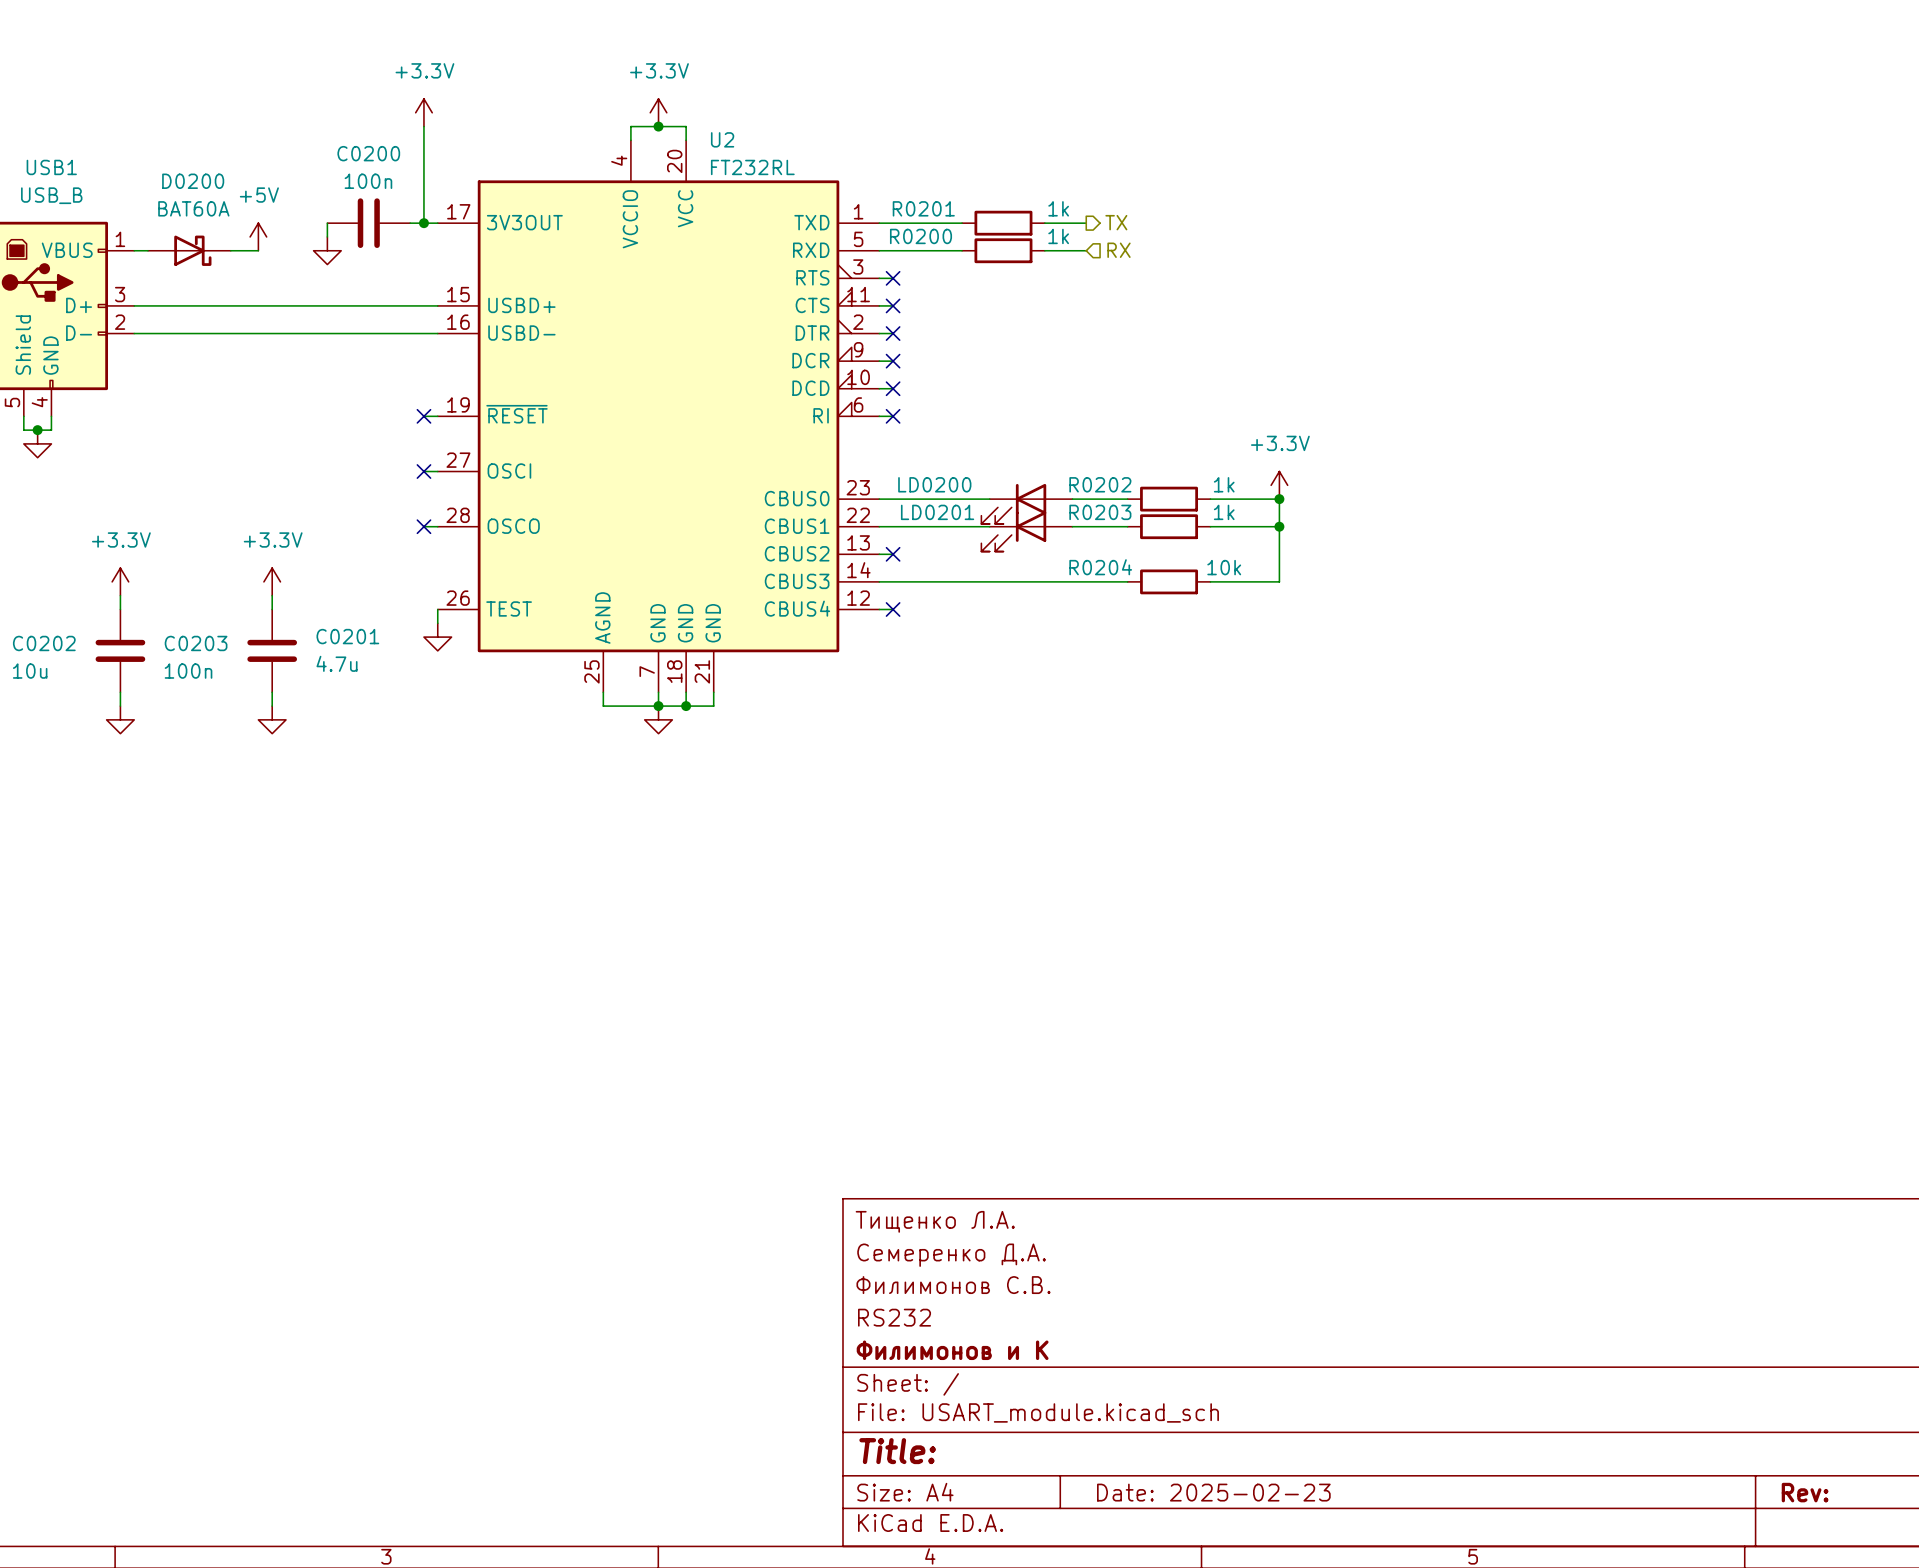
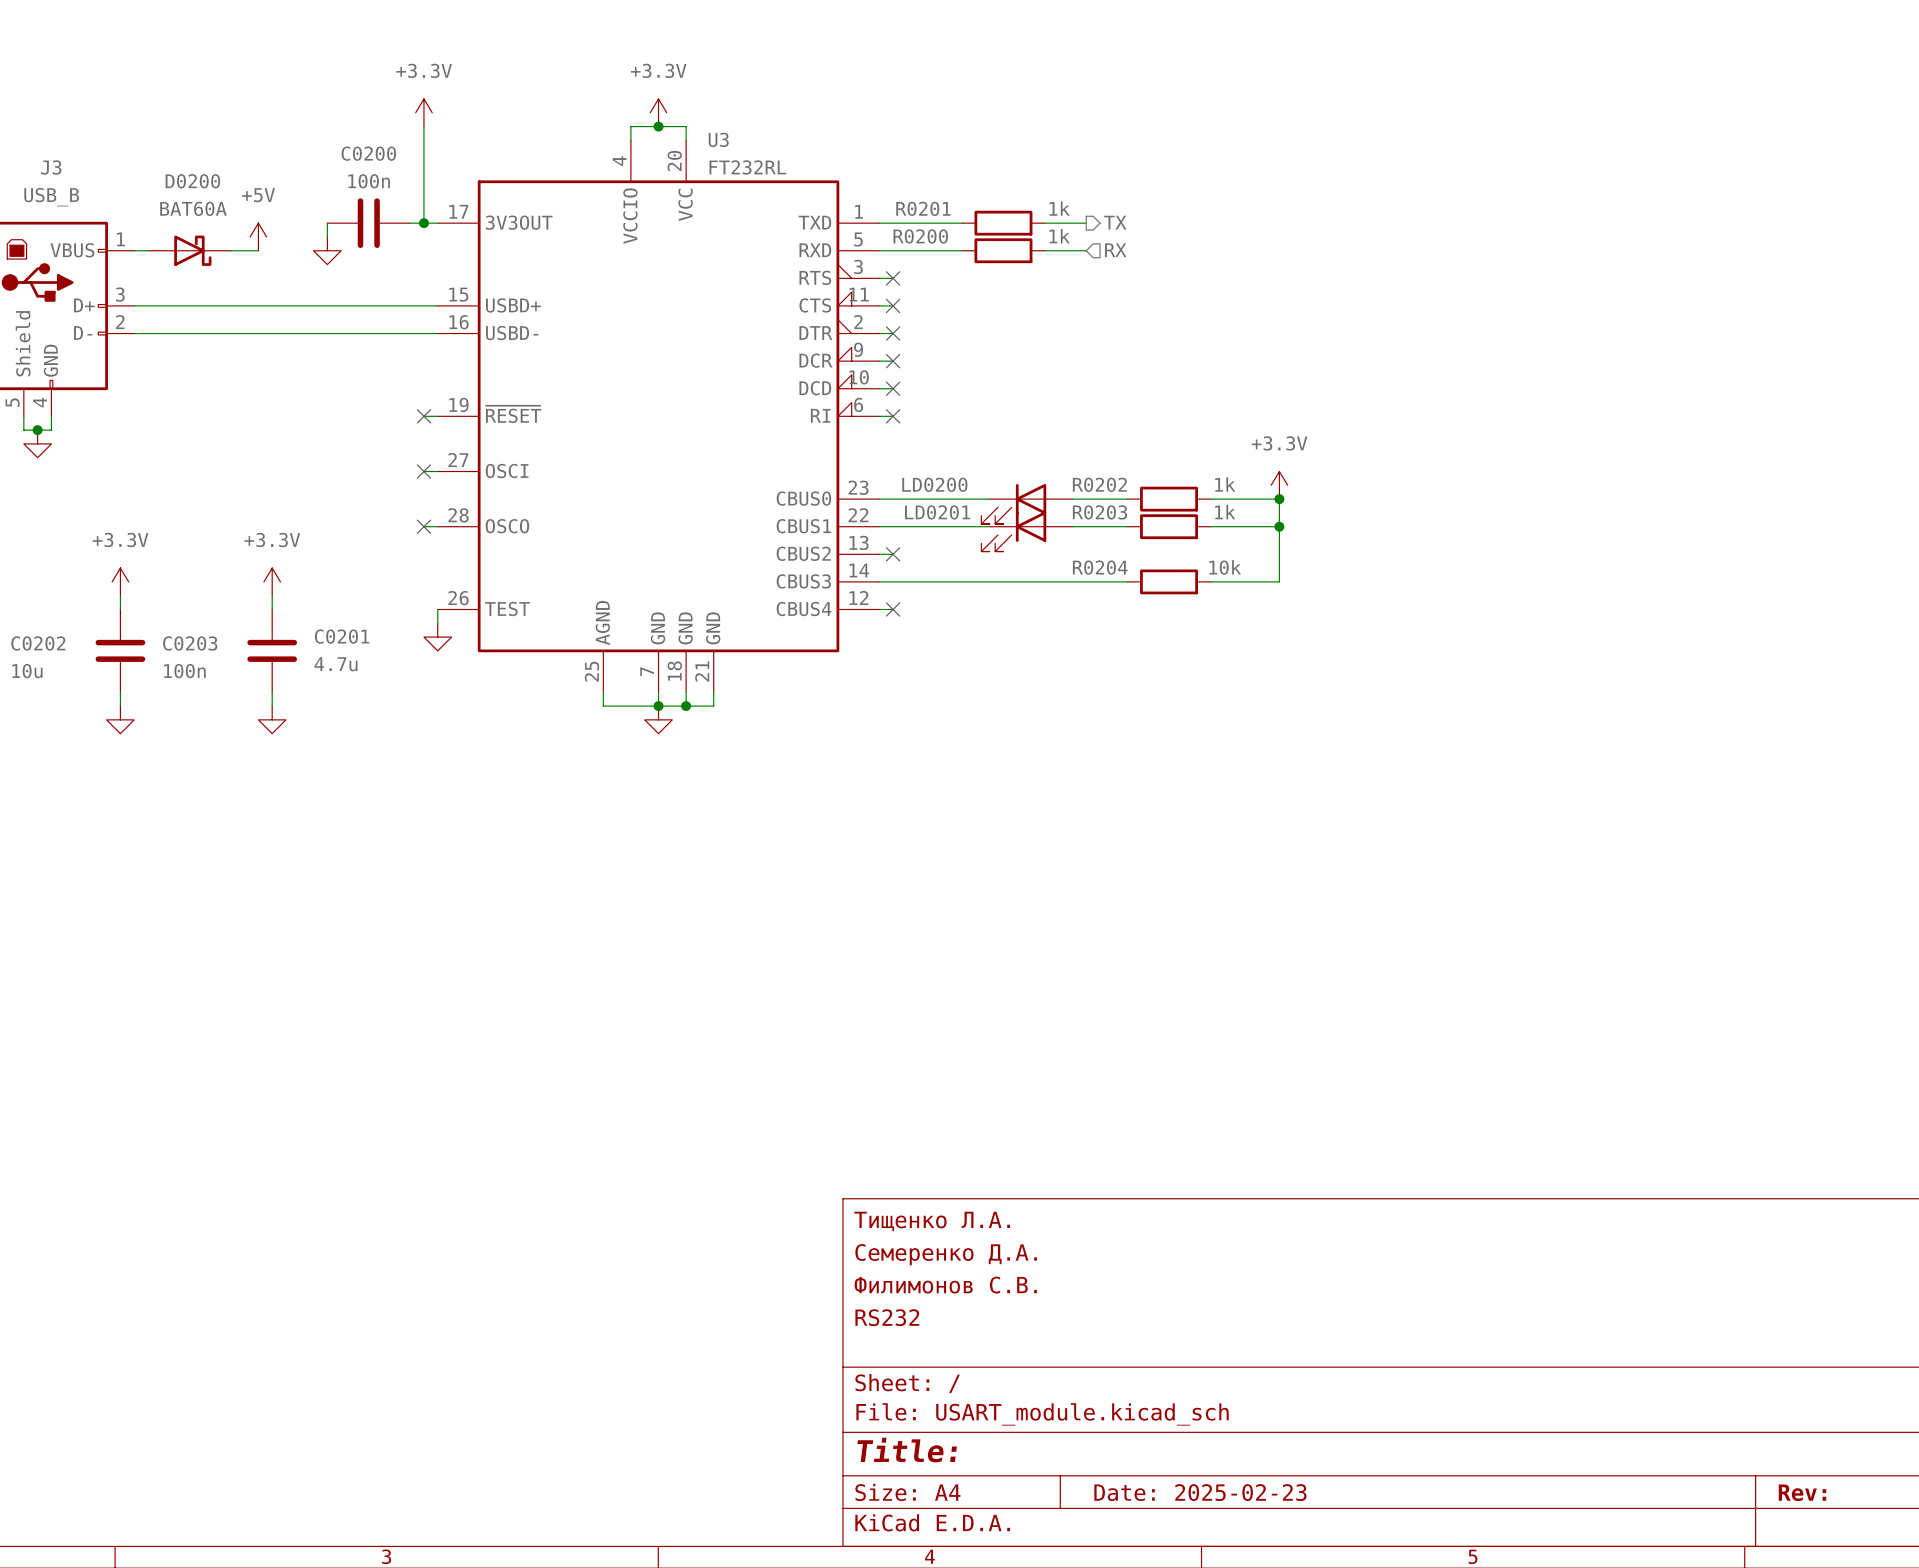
U2 name: U2 (722, 139) -> U3 (718, 139)
USB1 name: USB1 (51, 167) -> J3 (51, 167)
title block: Филимонов и К (952, 1350) -> none

